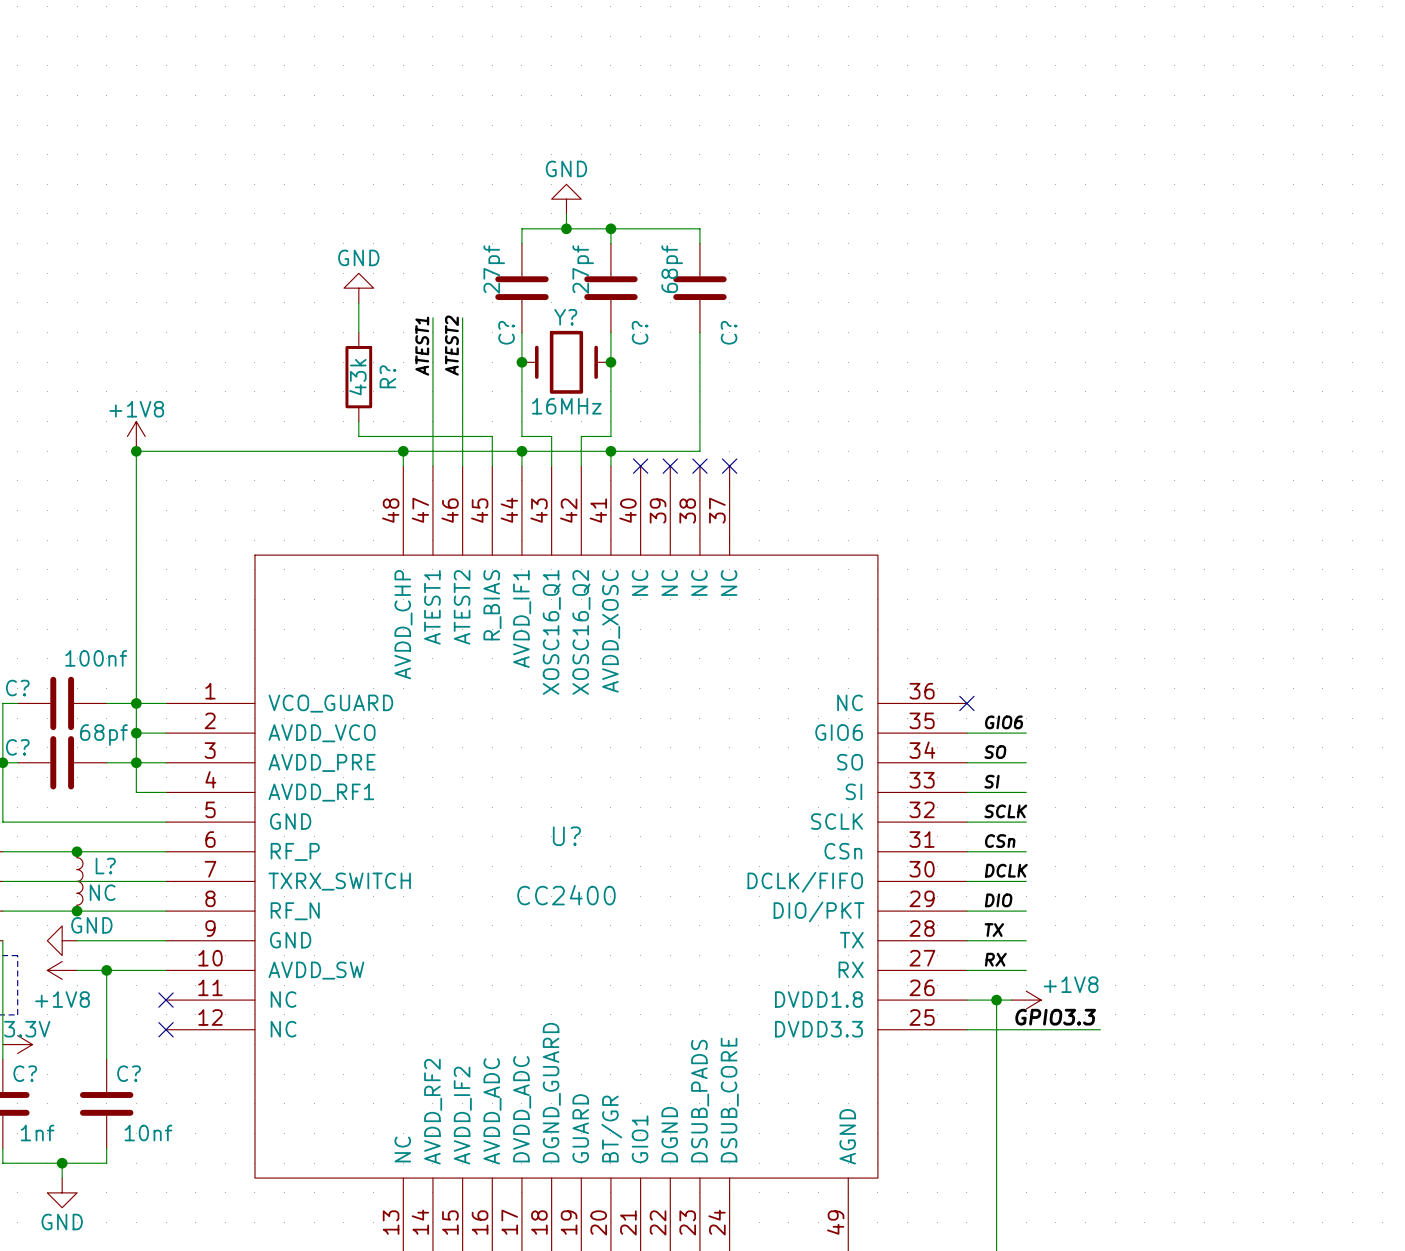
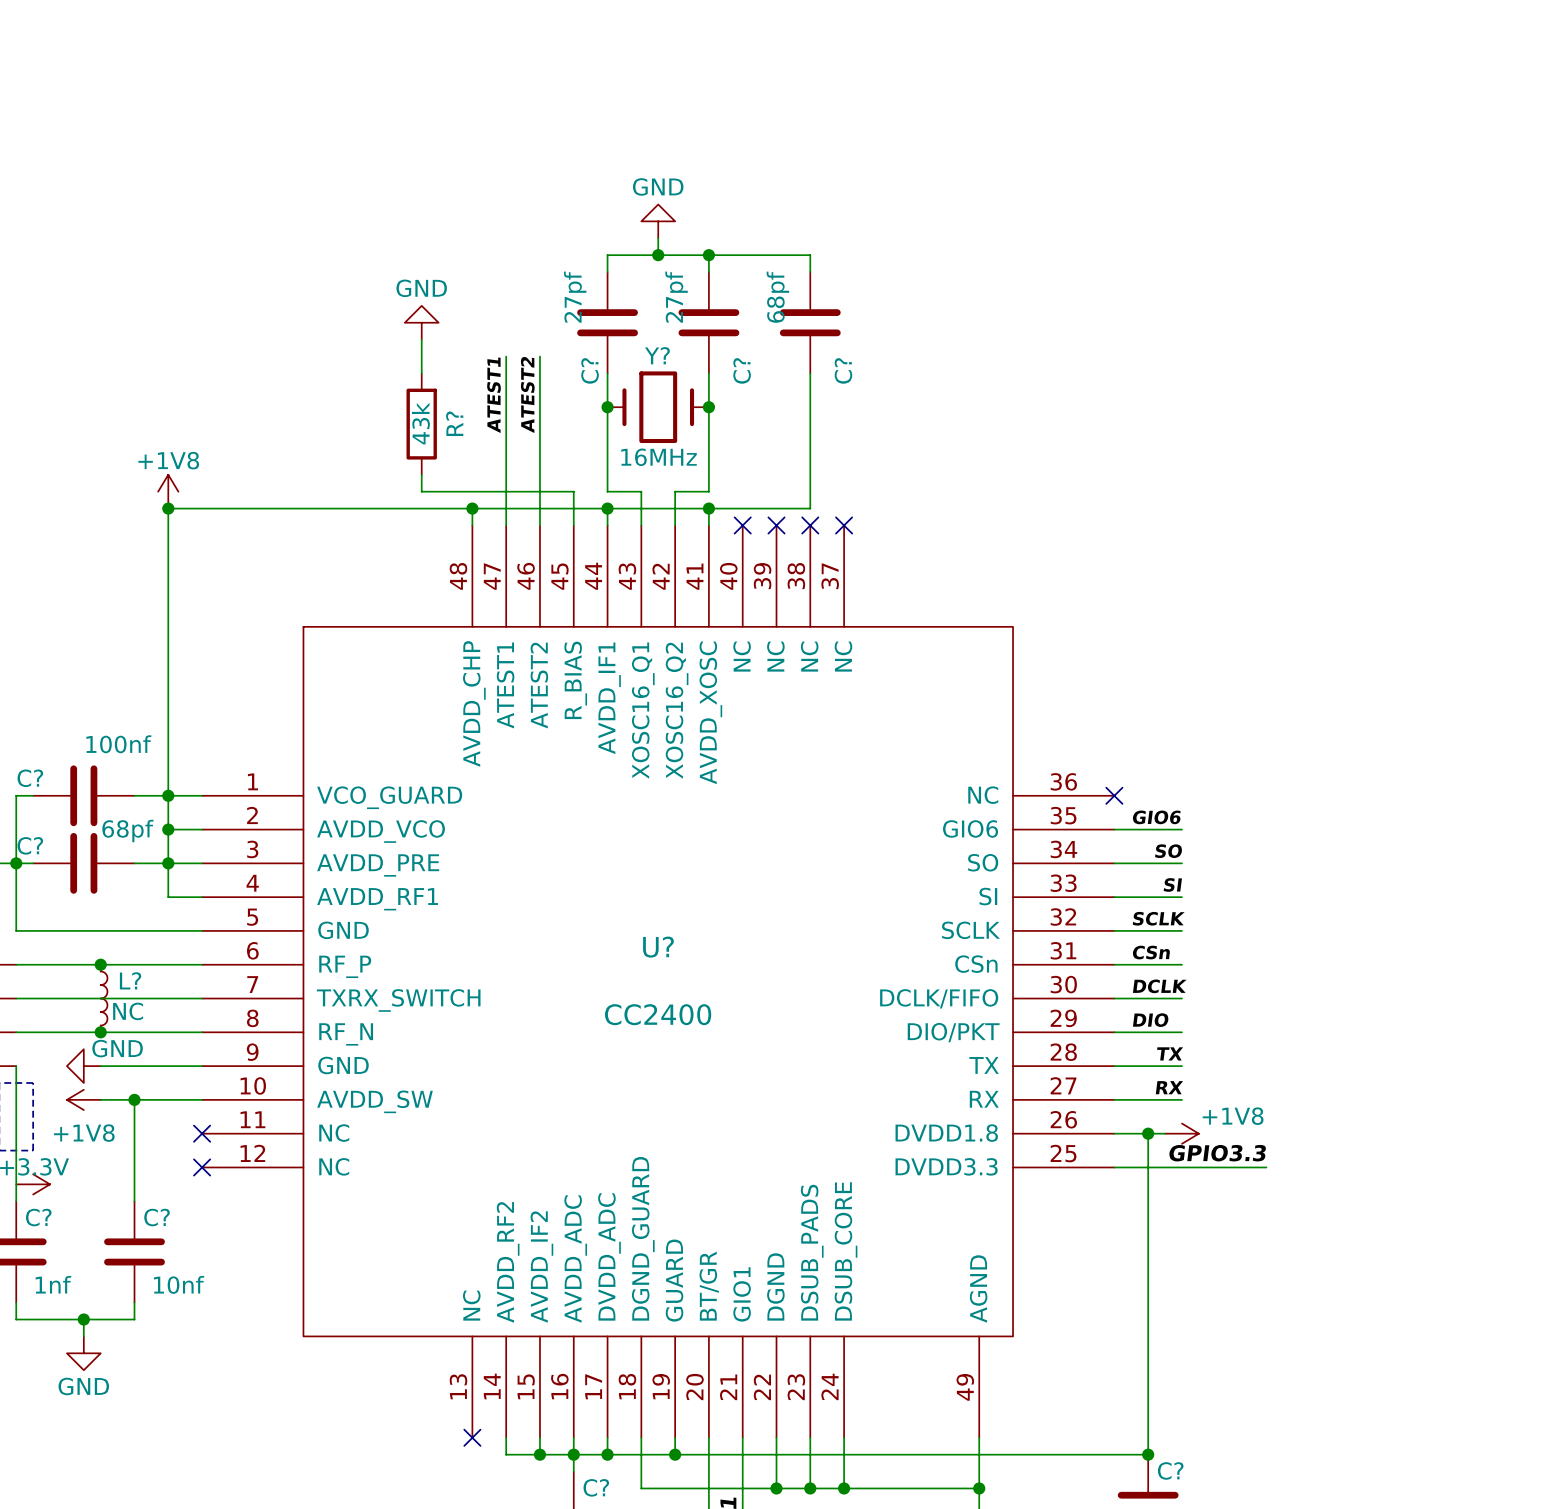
label position: ATEST2 (451, 345) -> ATEST2 (527, 394)
label position: ATEST1 (422, 346) -> ATEST1 (493, 395)
label position: SO (995, 752) -> SO (1168, 851)
label position: SI (992, 781) -> SI (1172, 884)
label position: TX (994, 930) -> TX (1170, 1053)
label position: RX (995, 959) -> RX (1169, 1087)
label position: GPIO3.3 (1055, 1017) -> GPIO3.3 (1217, 1153)

